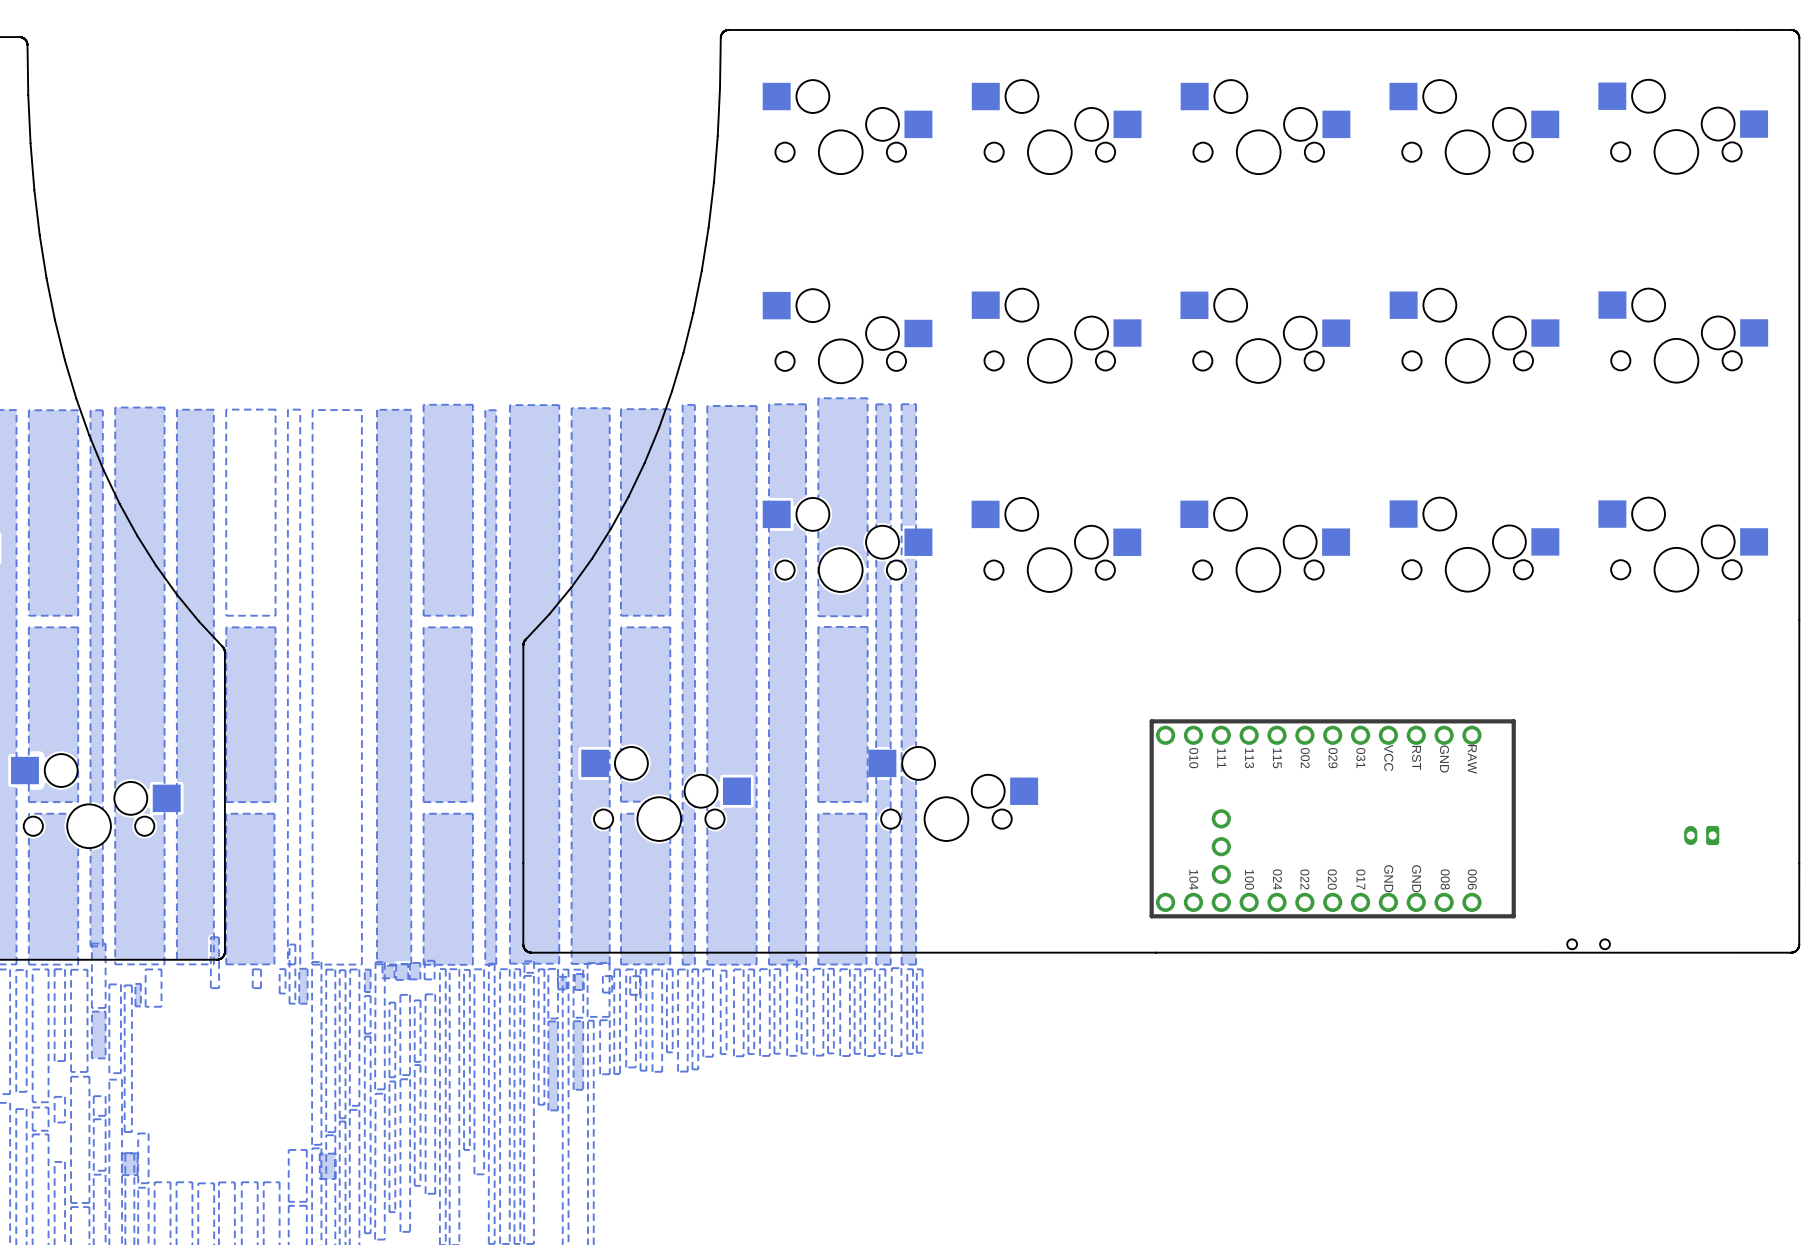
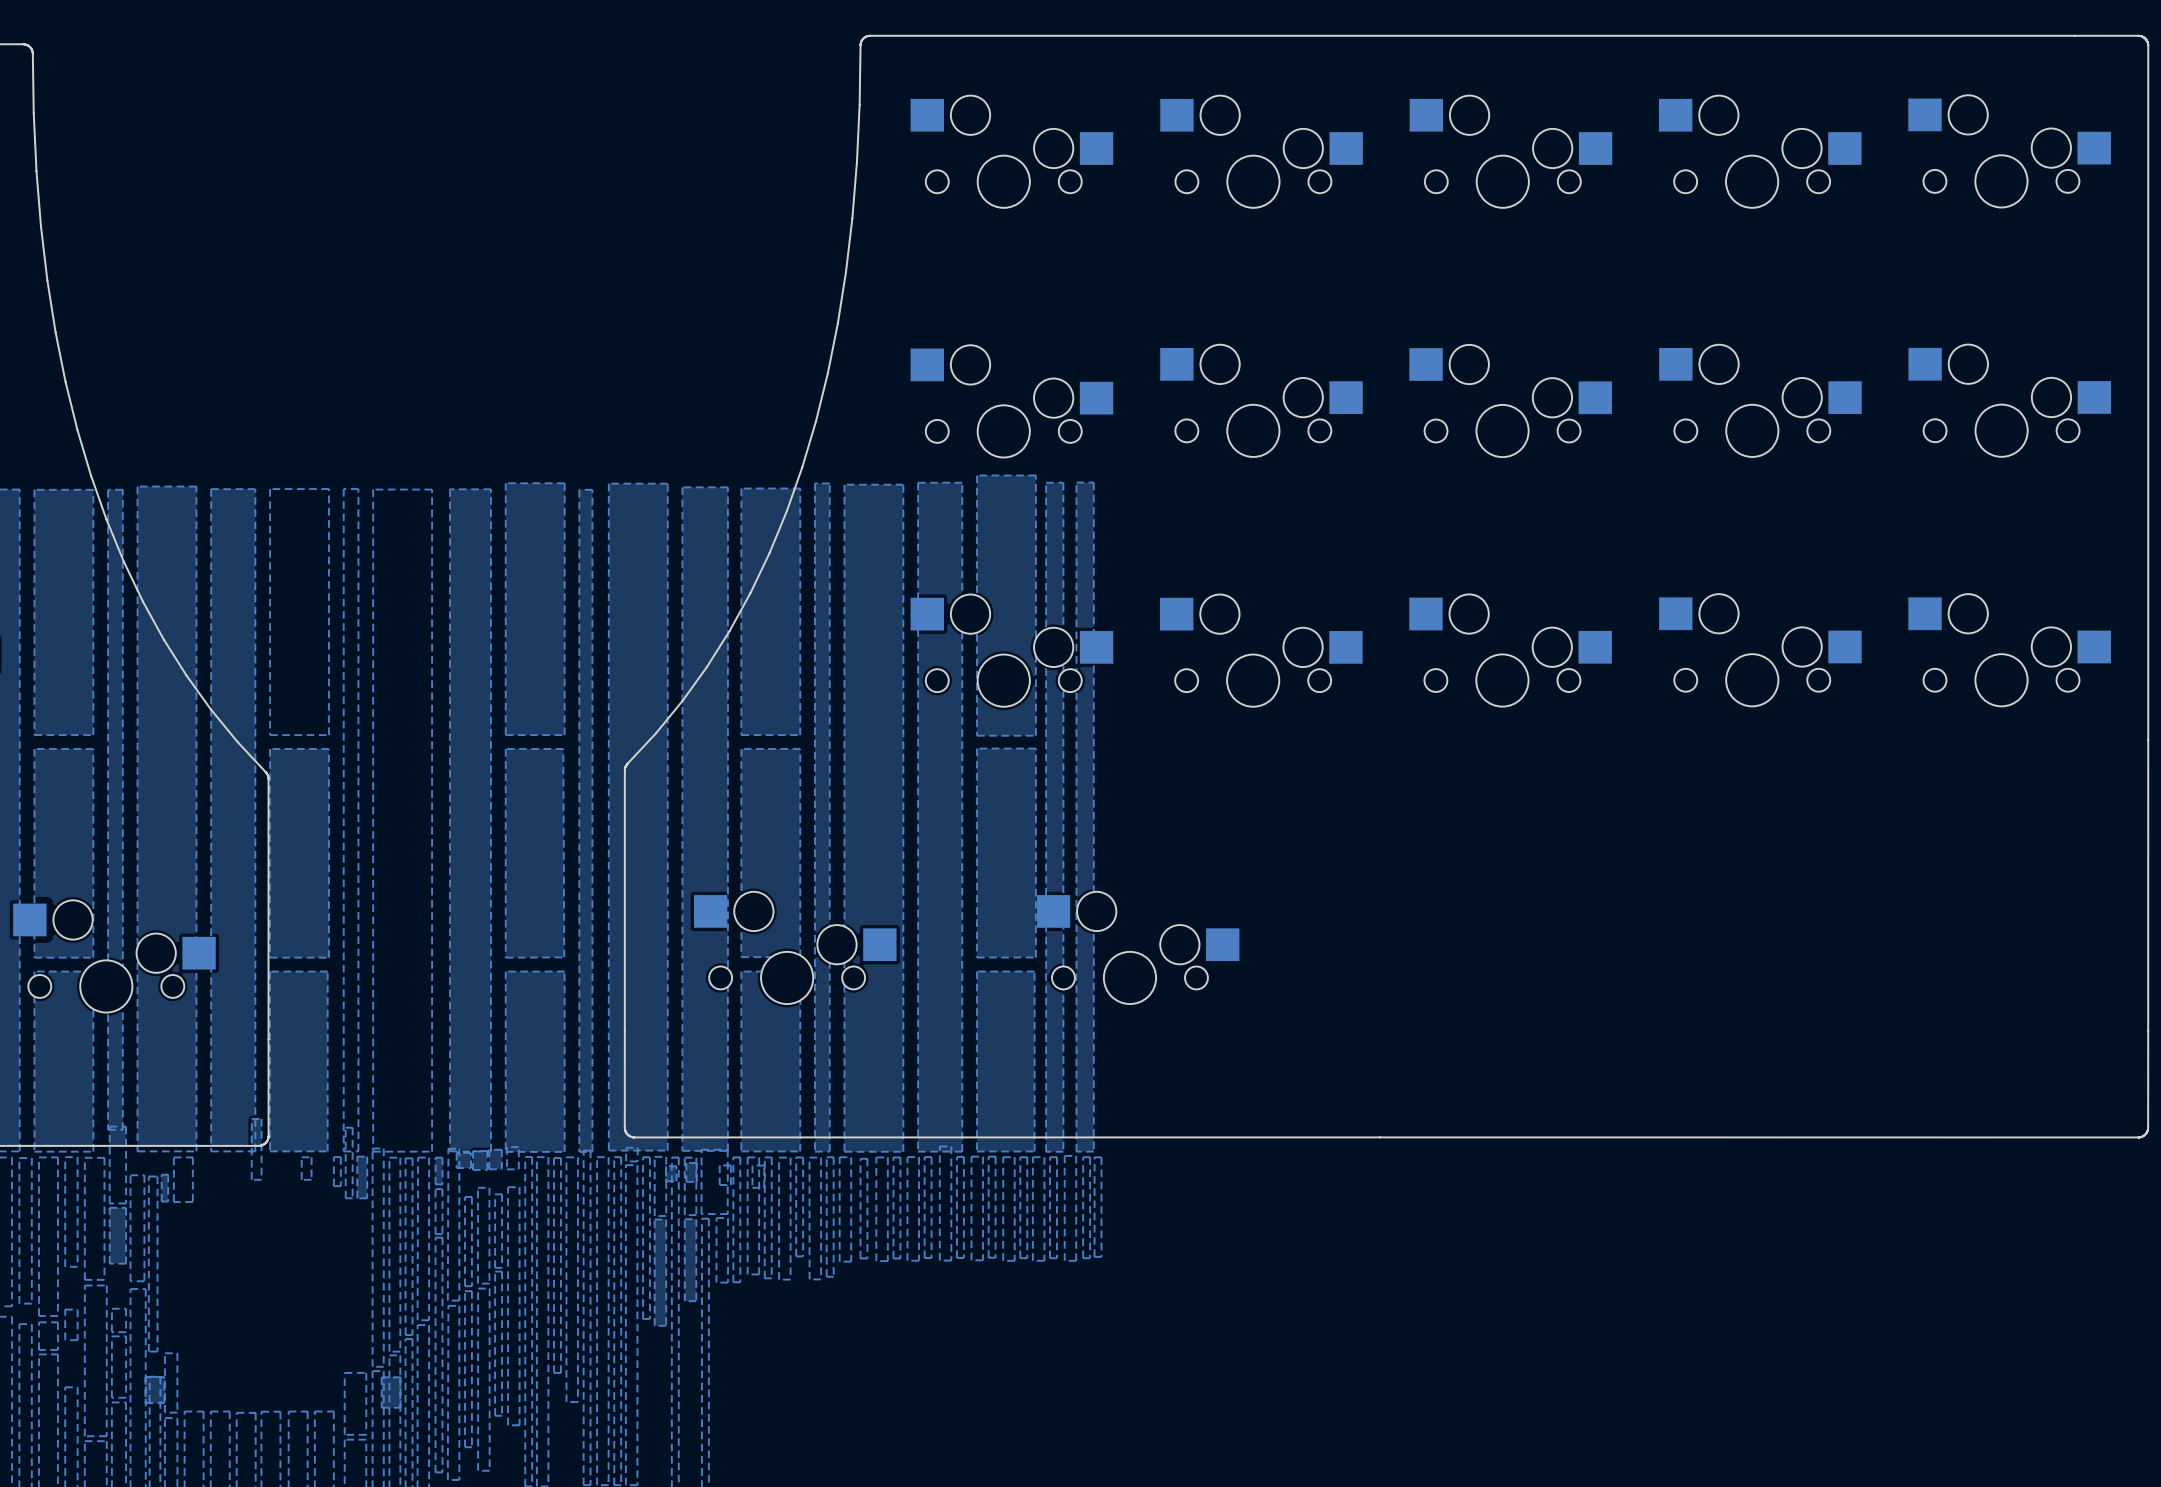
part: (1332, 818) -> none
part: (1701, 835) -> none
part: (1588, 944) -> none

